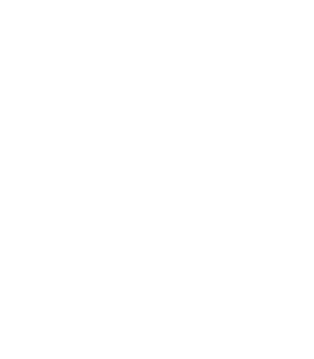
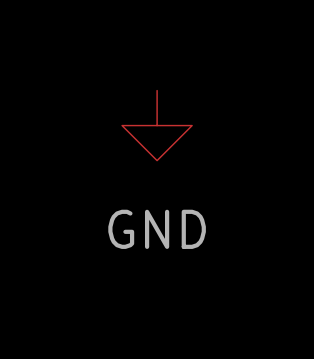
power symbol: none -> GND (157, 125)

